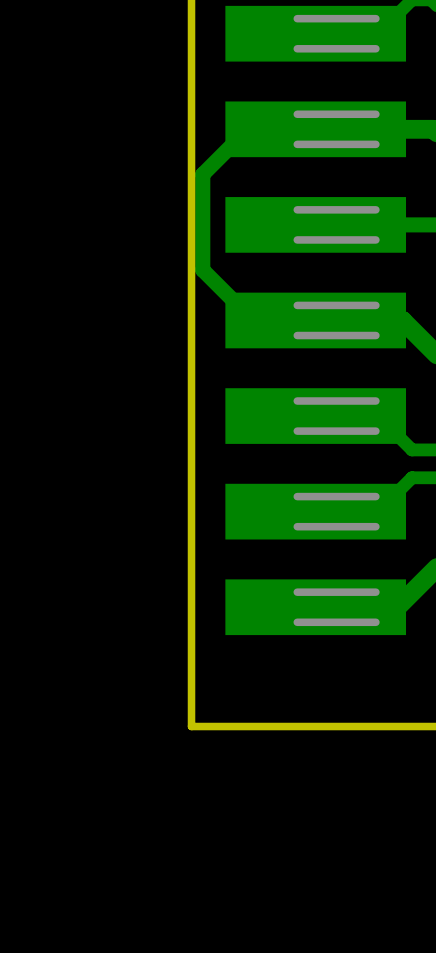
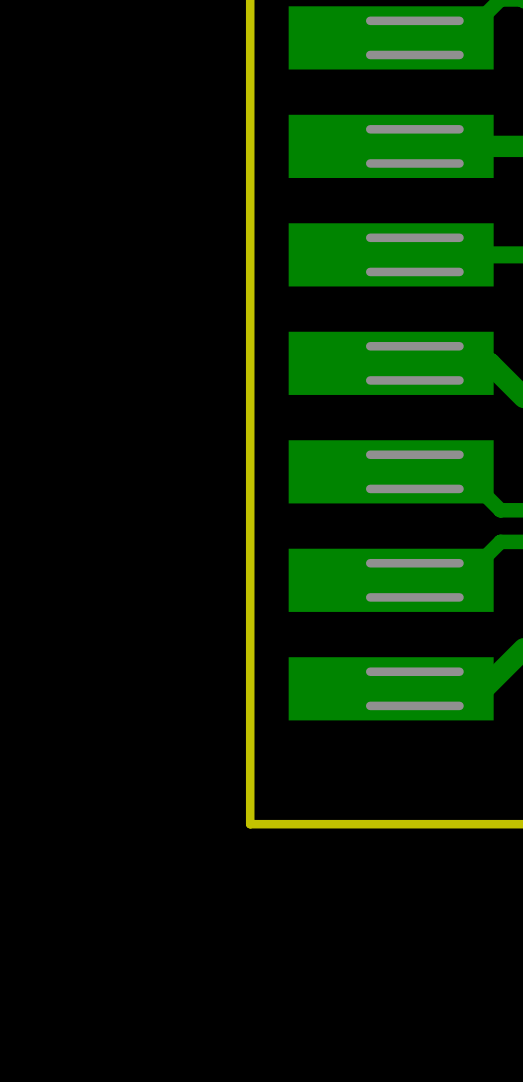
track: (315, 129) (247, 129) (202, 174) (202, 270) (253, 320) (315, 320) -> none

